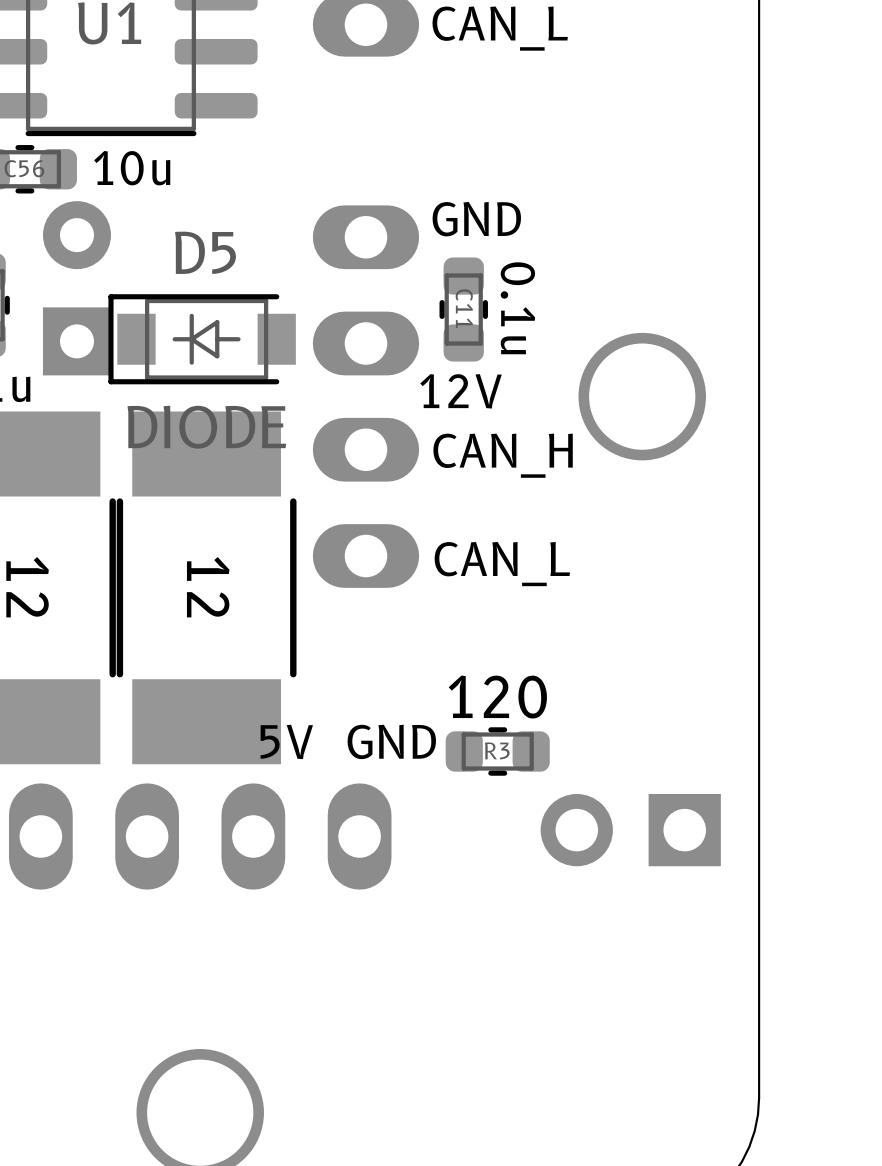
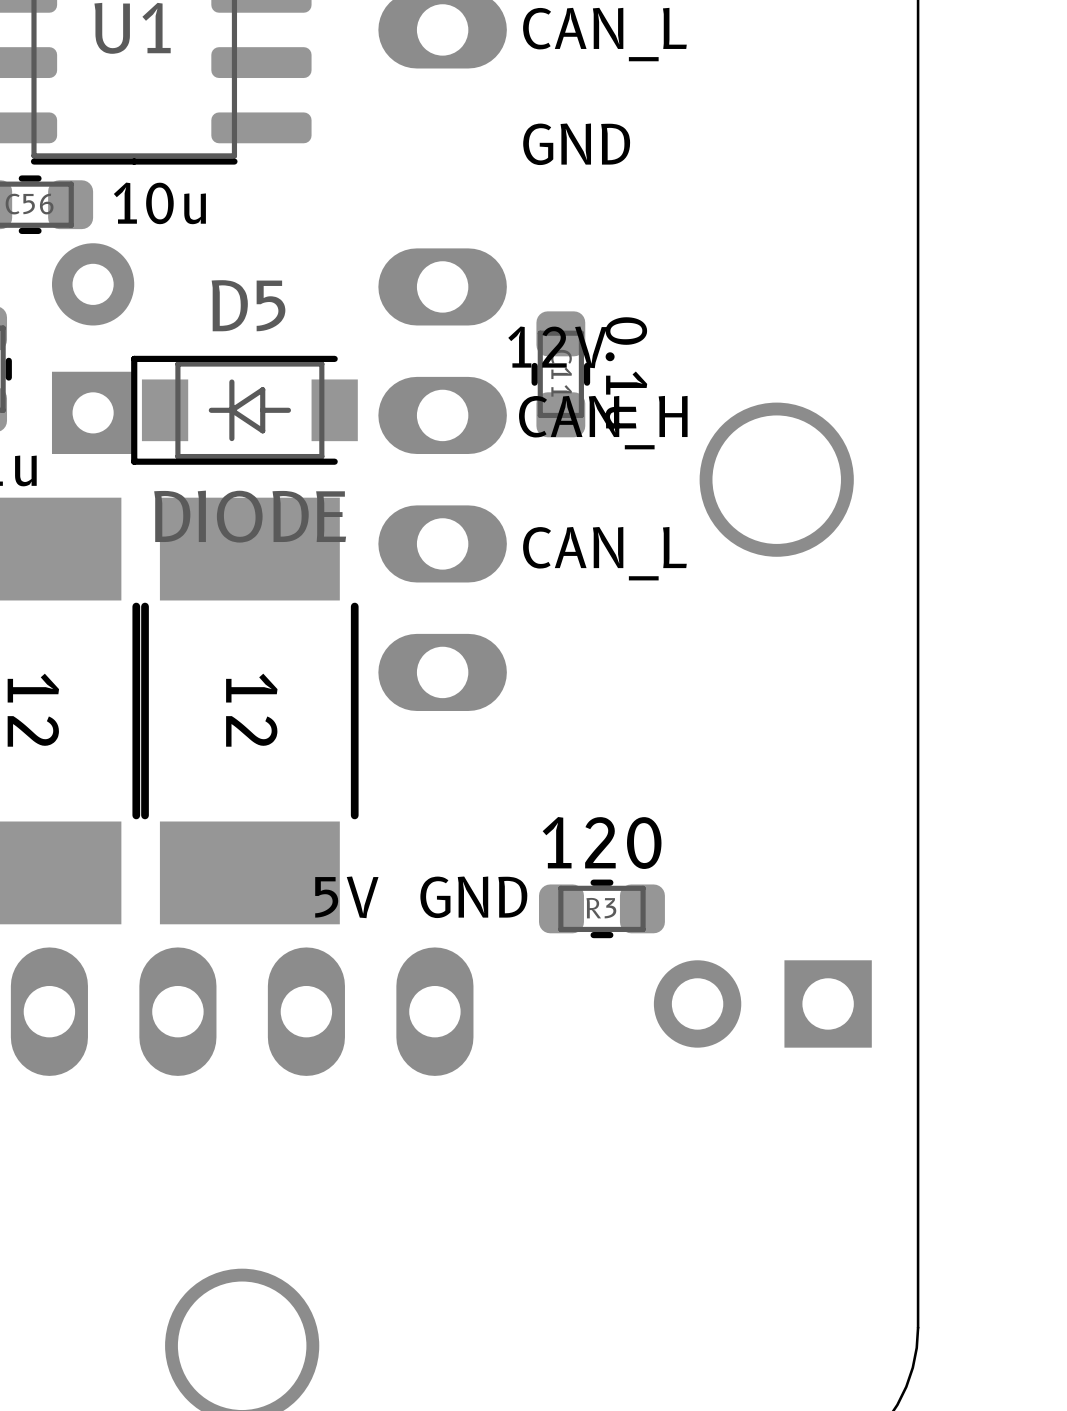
text position: GND (476, 219) -> GND (576, 144)
text: none -> CAN_H (603, 422)
text position: 12V (461, 391) -> 12V (557, 347)
text: CAN_H (503, 455) -> CAN_L (604, 553)
text: CAN_L (502, 564) -> none

